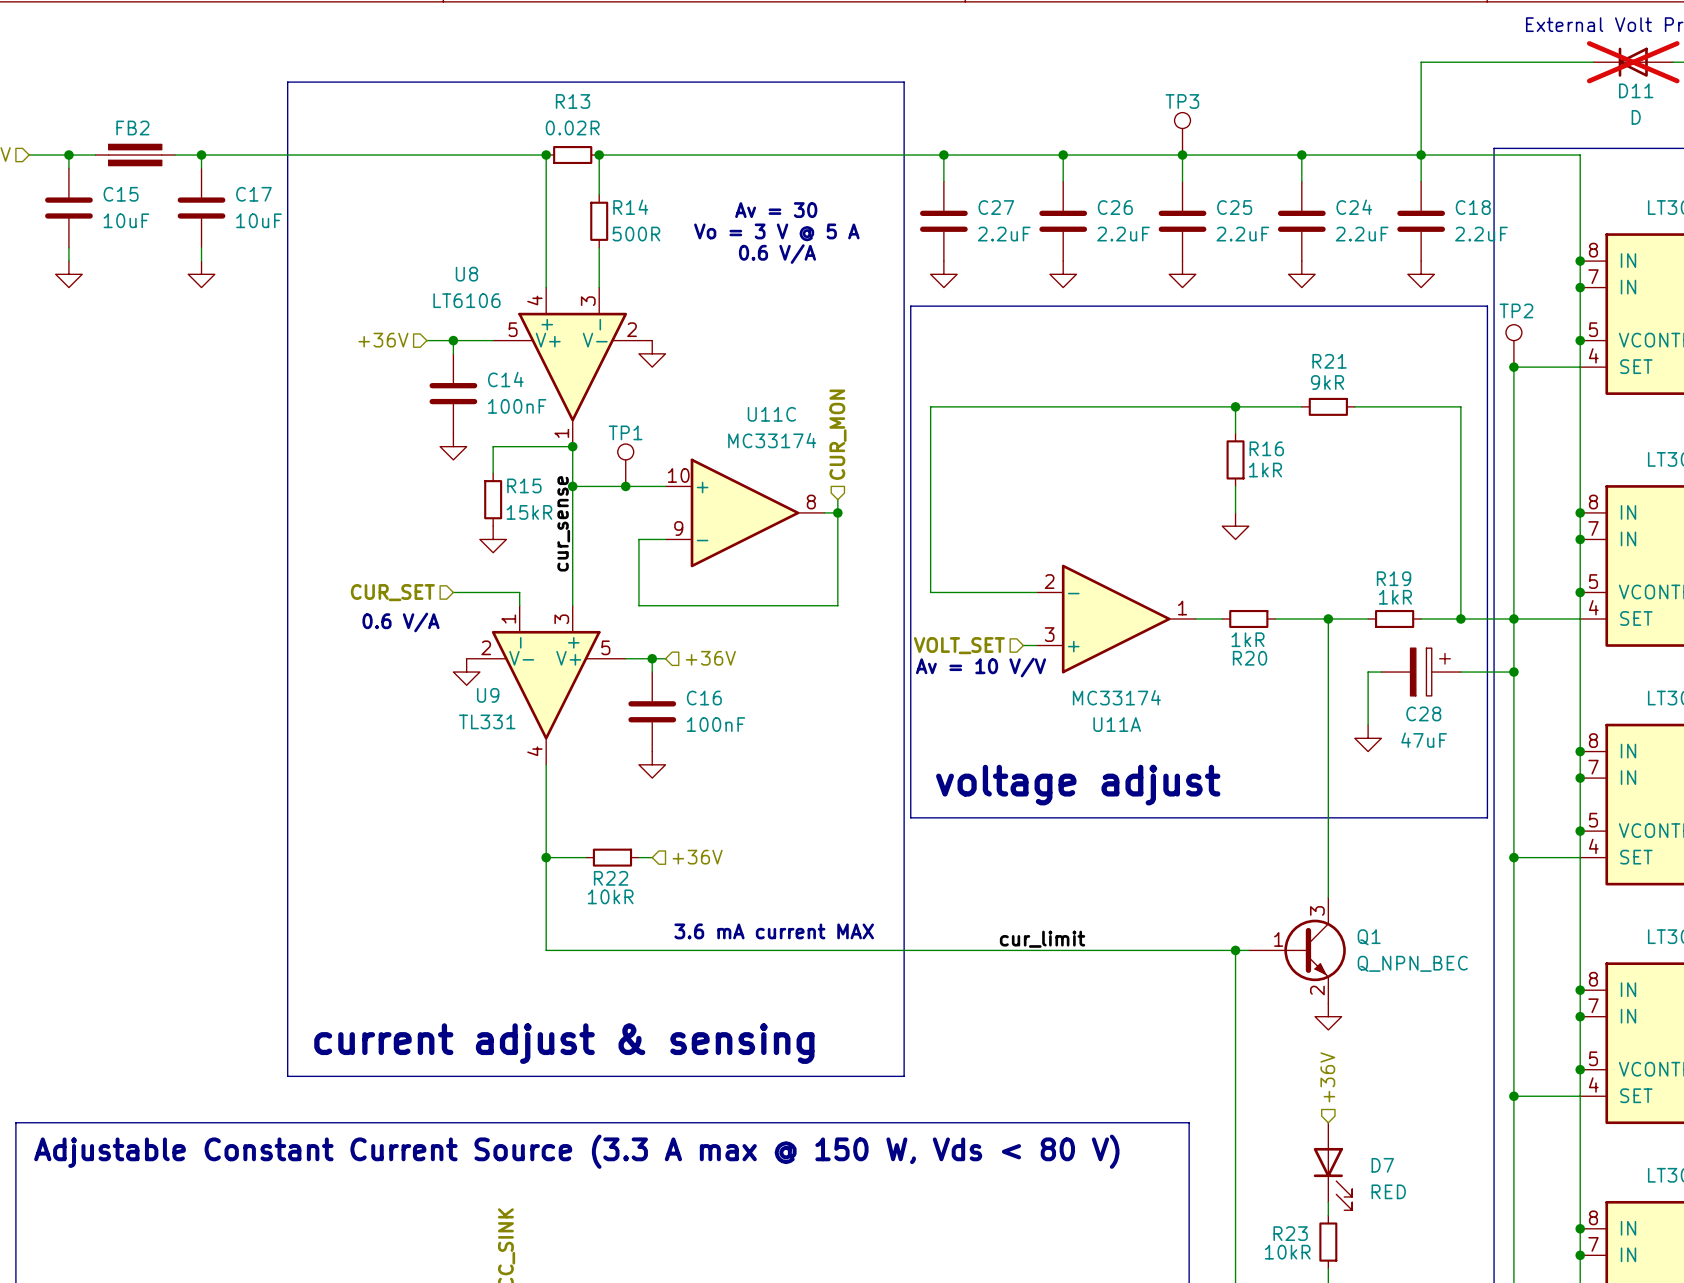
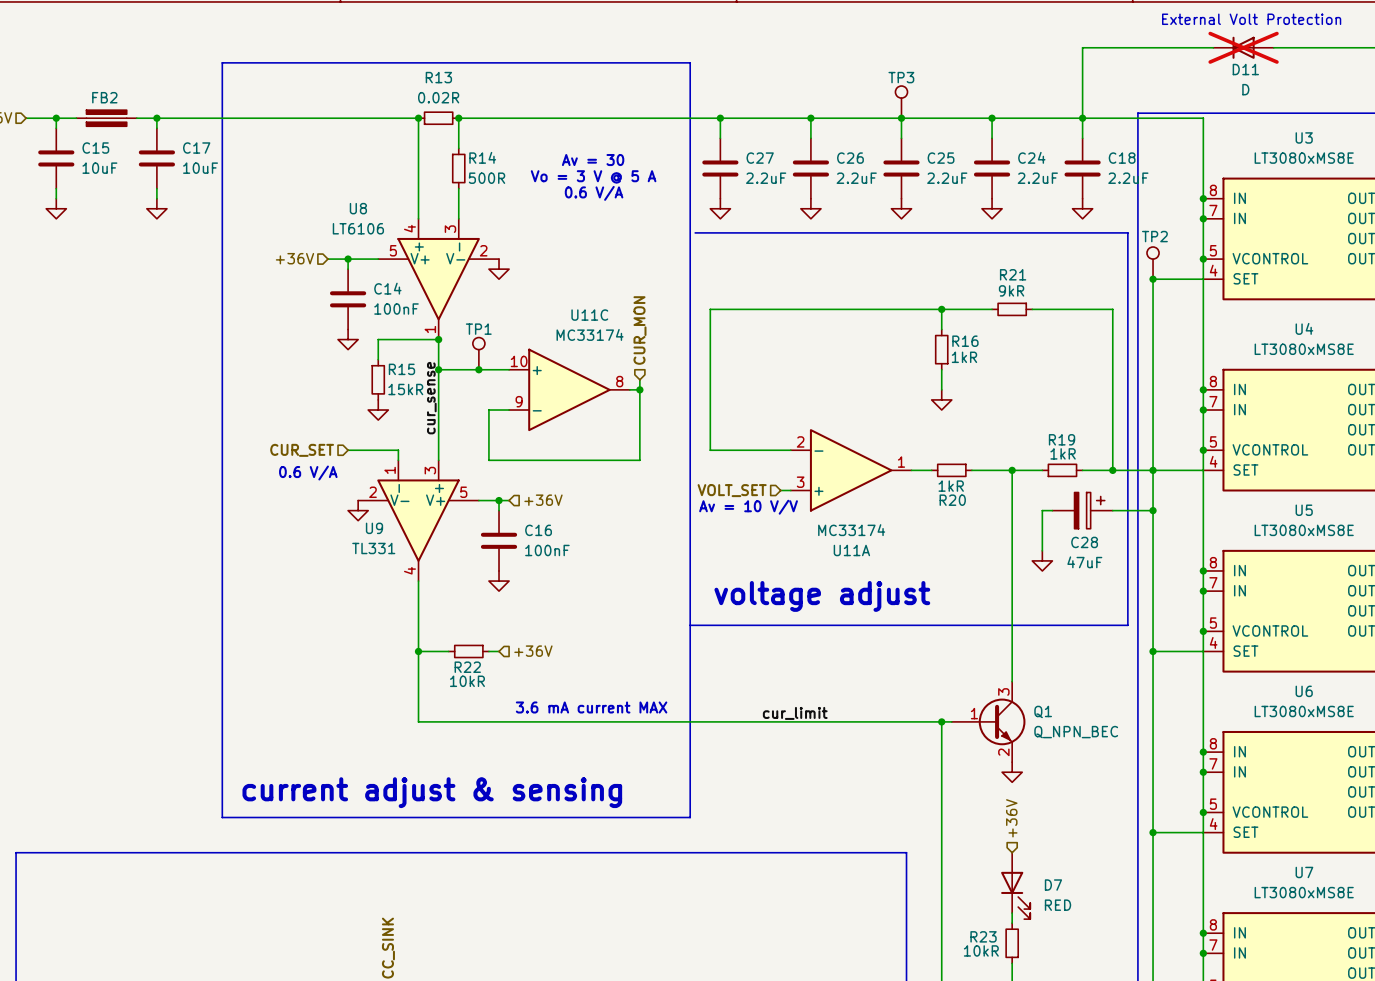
line: (910, 306) (910, 817) (1487, 817) (1487, 306) (1480, 306) -> (690, 625) (1127, 625) (1127, 232)
text: Adjustable Constant Current Source (3.3 A max @ 150 W, Vds < 80 V) (576, 1151) -> none

